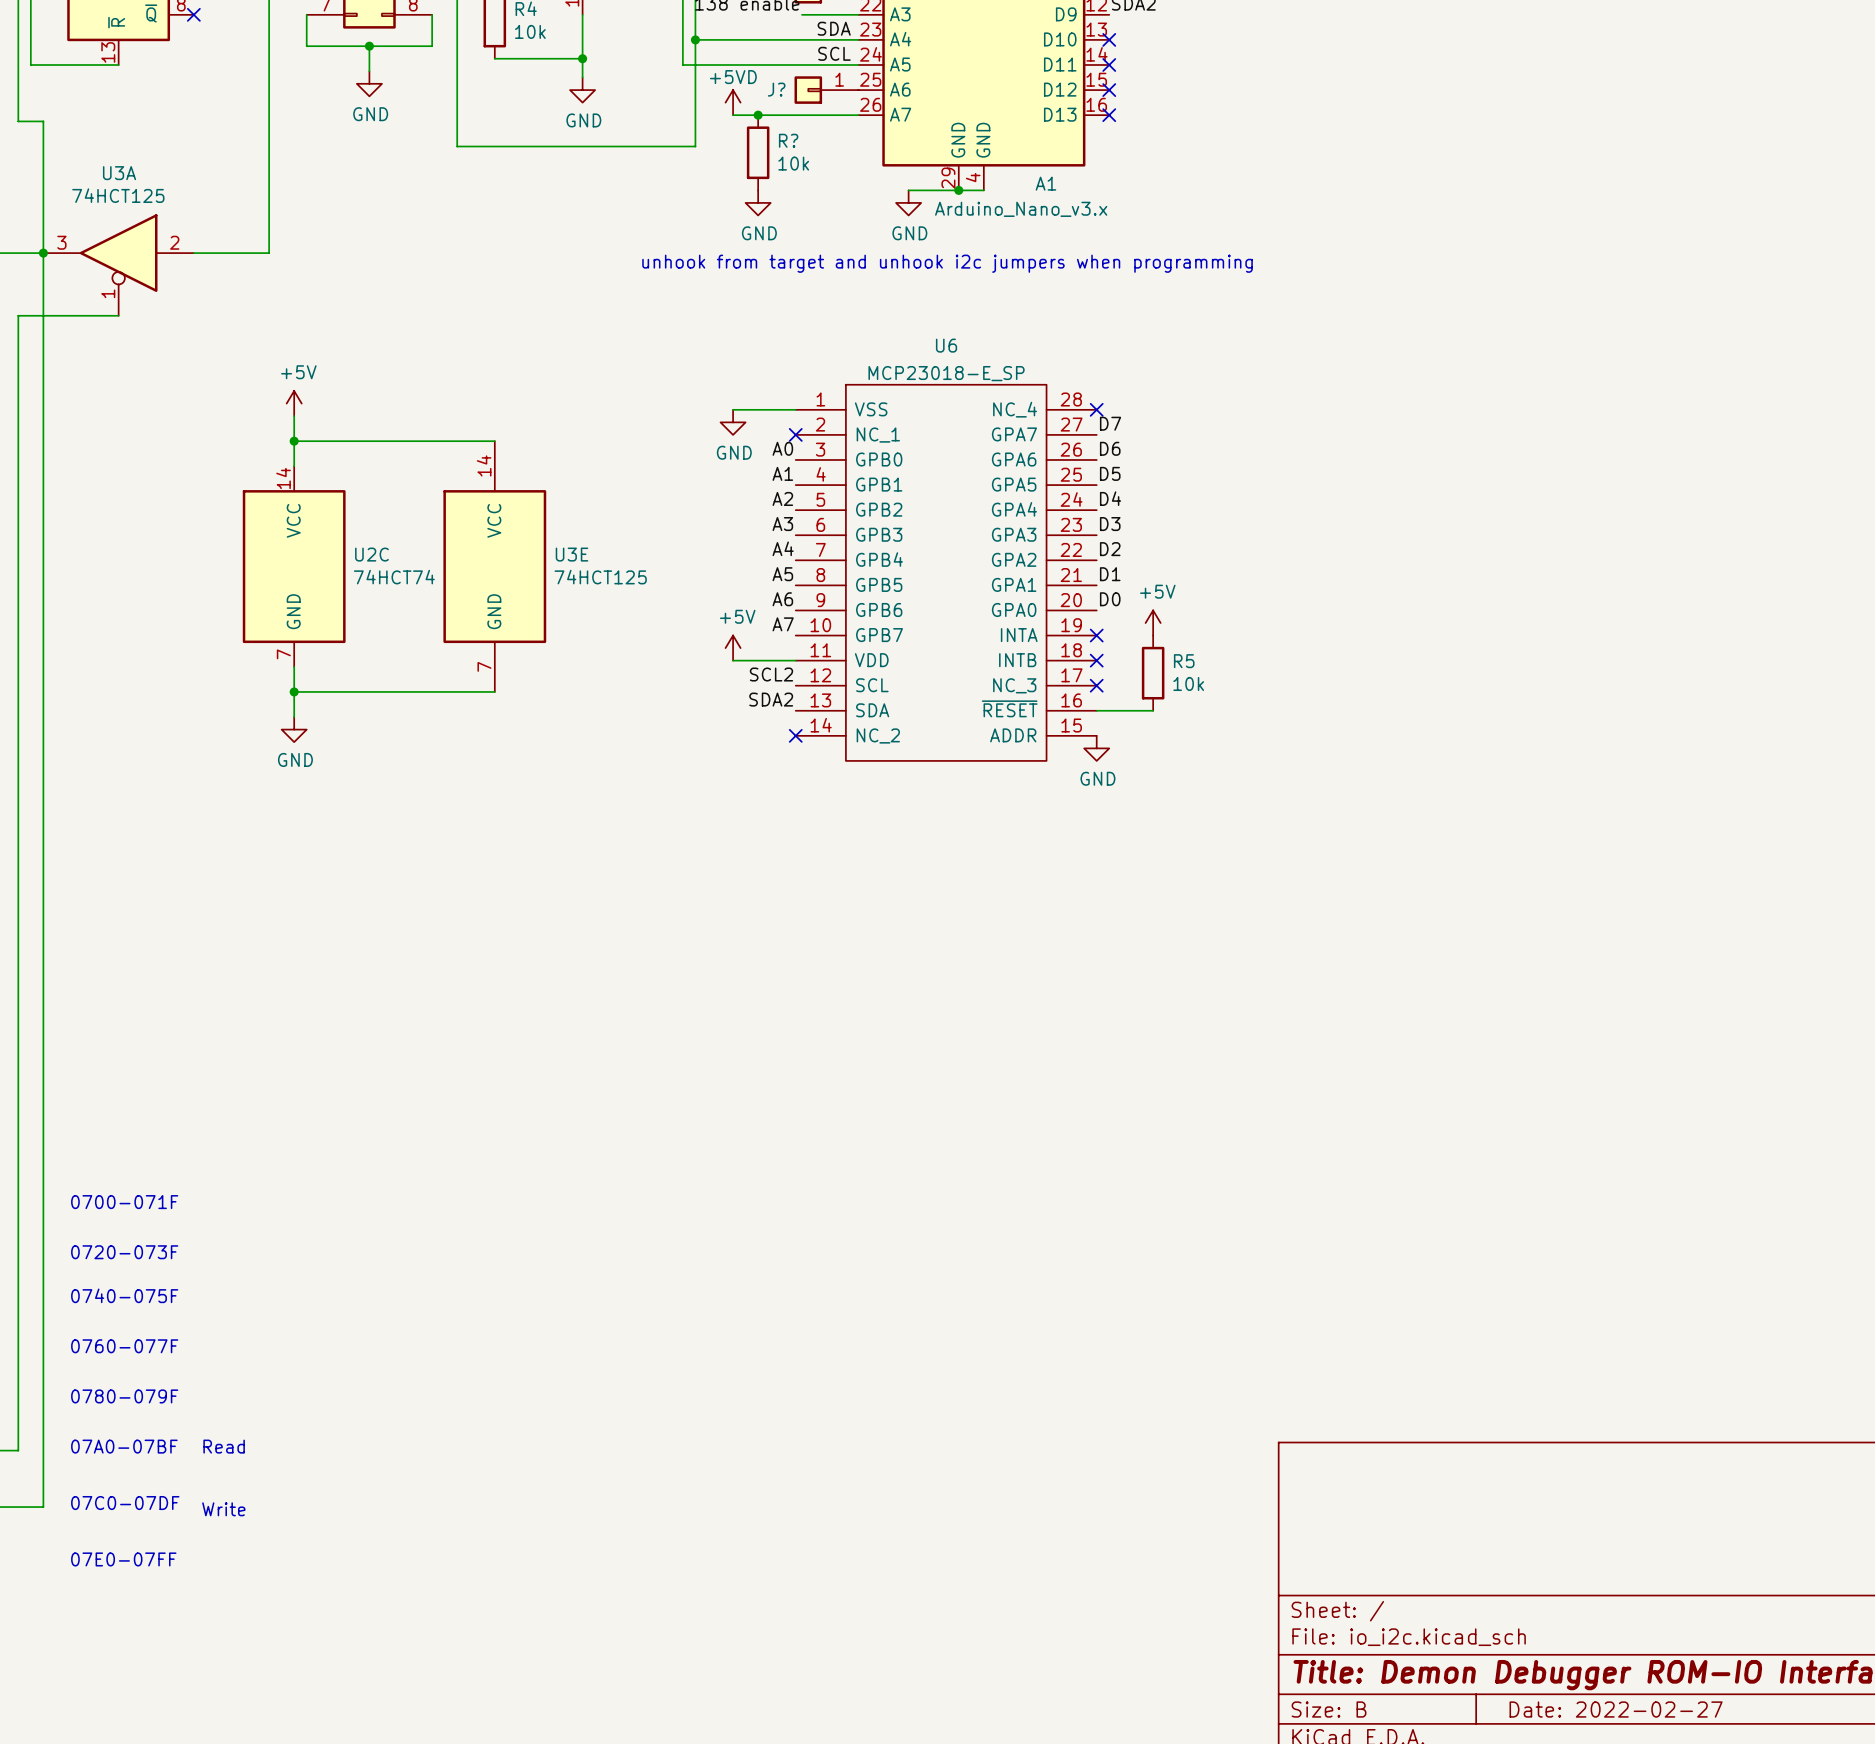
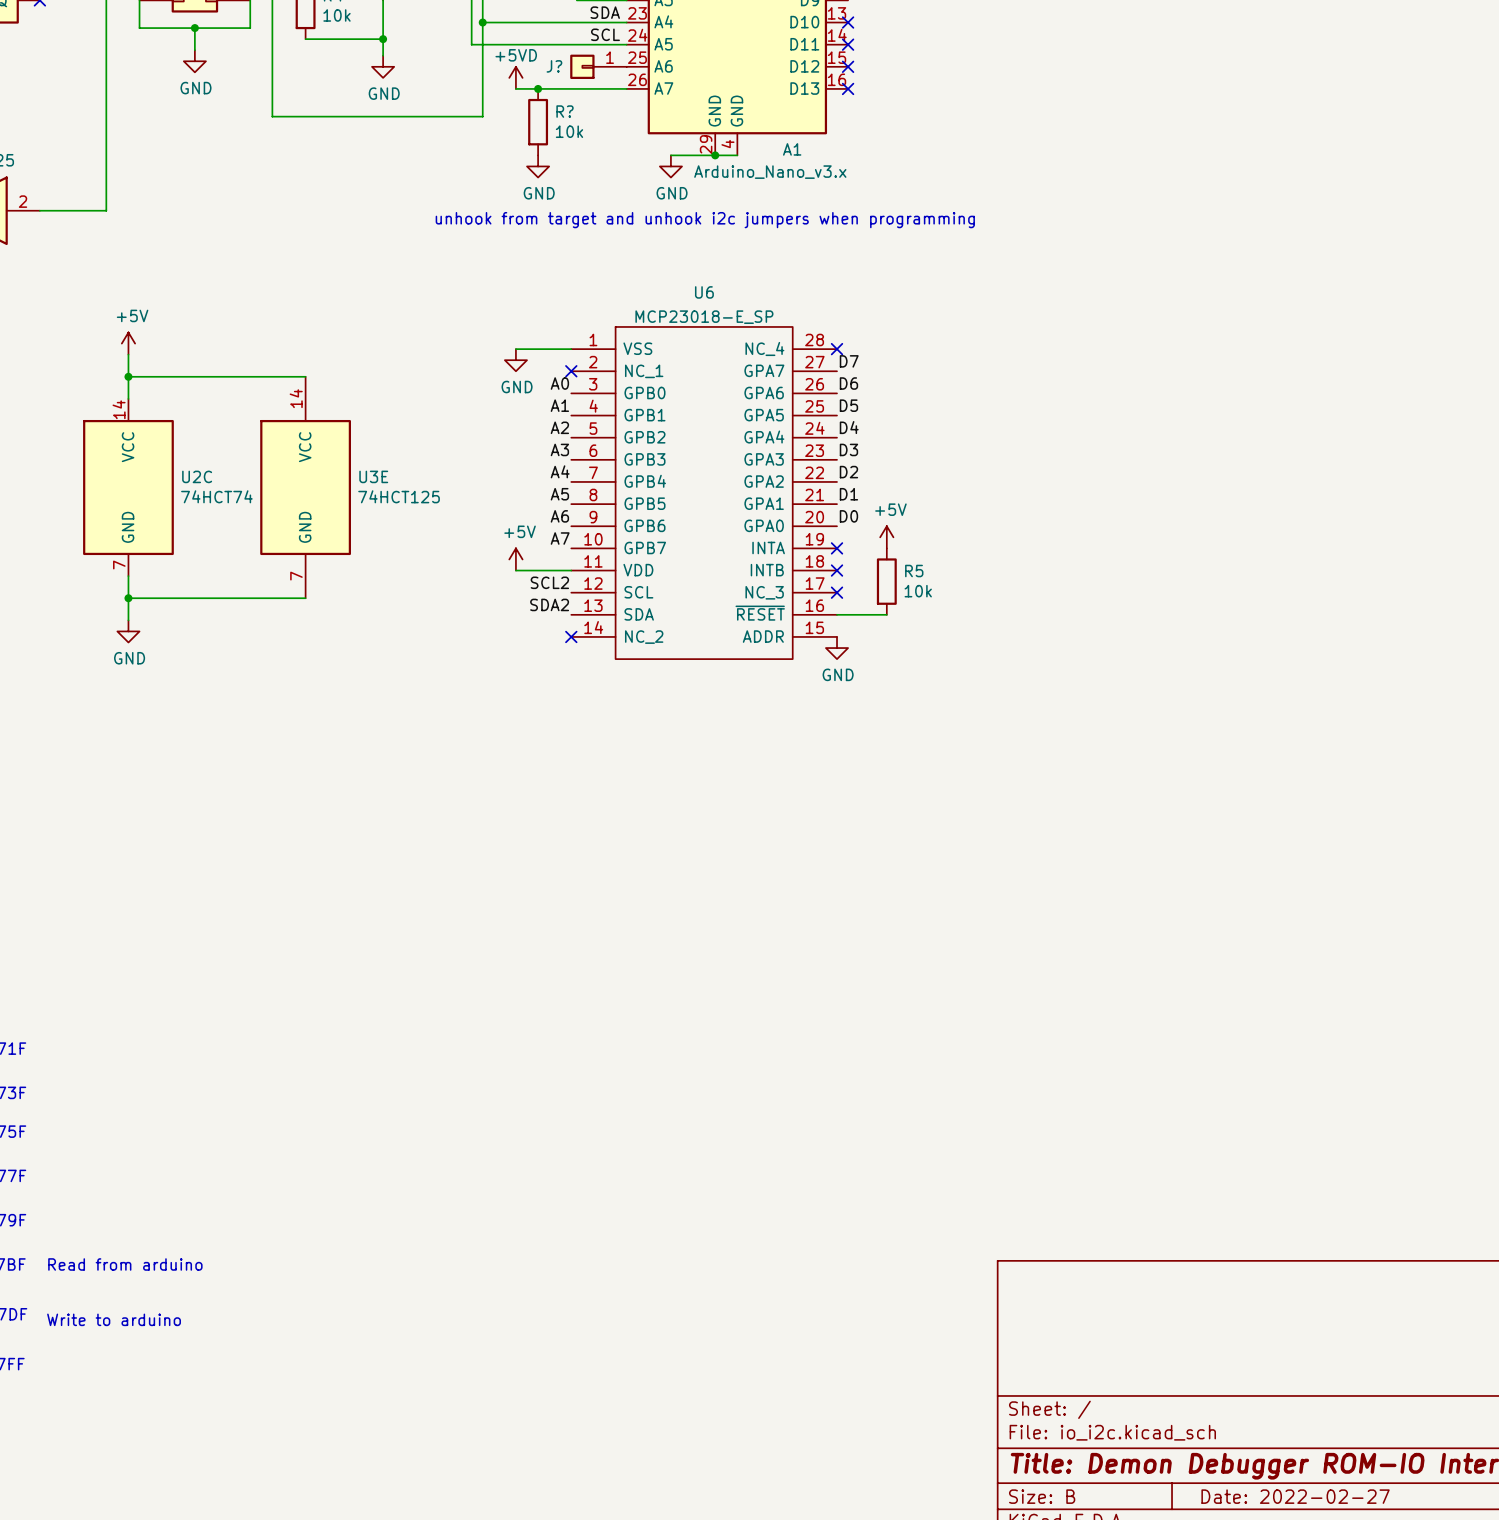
text: Read (224, 1446) -> Read from arduino (125, 1264)
text: Write (223, 1509) -> Write to arduino (114, 1319)

